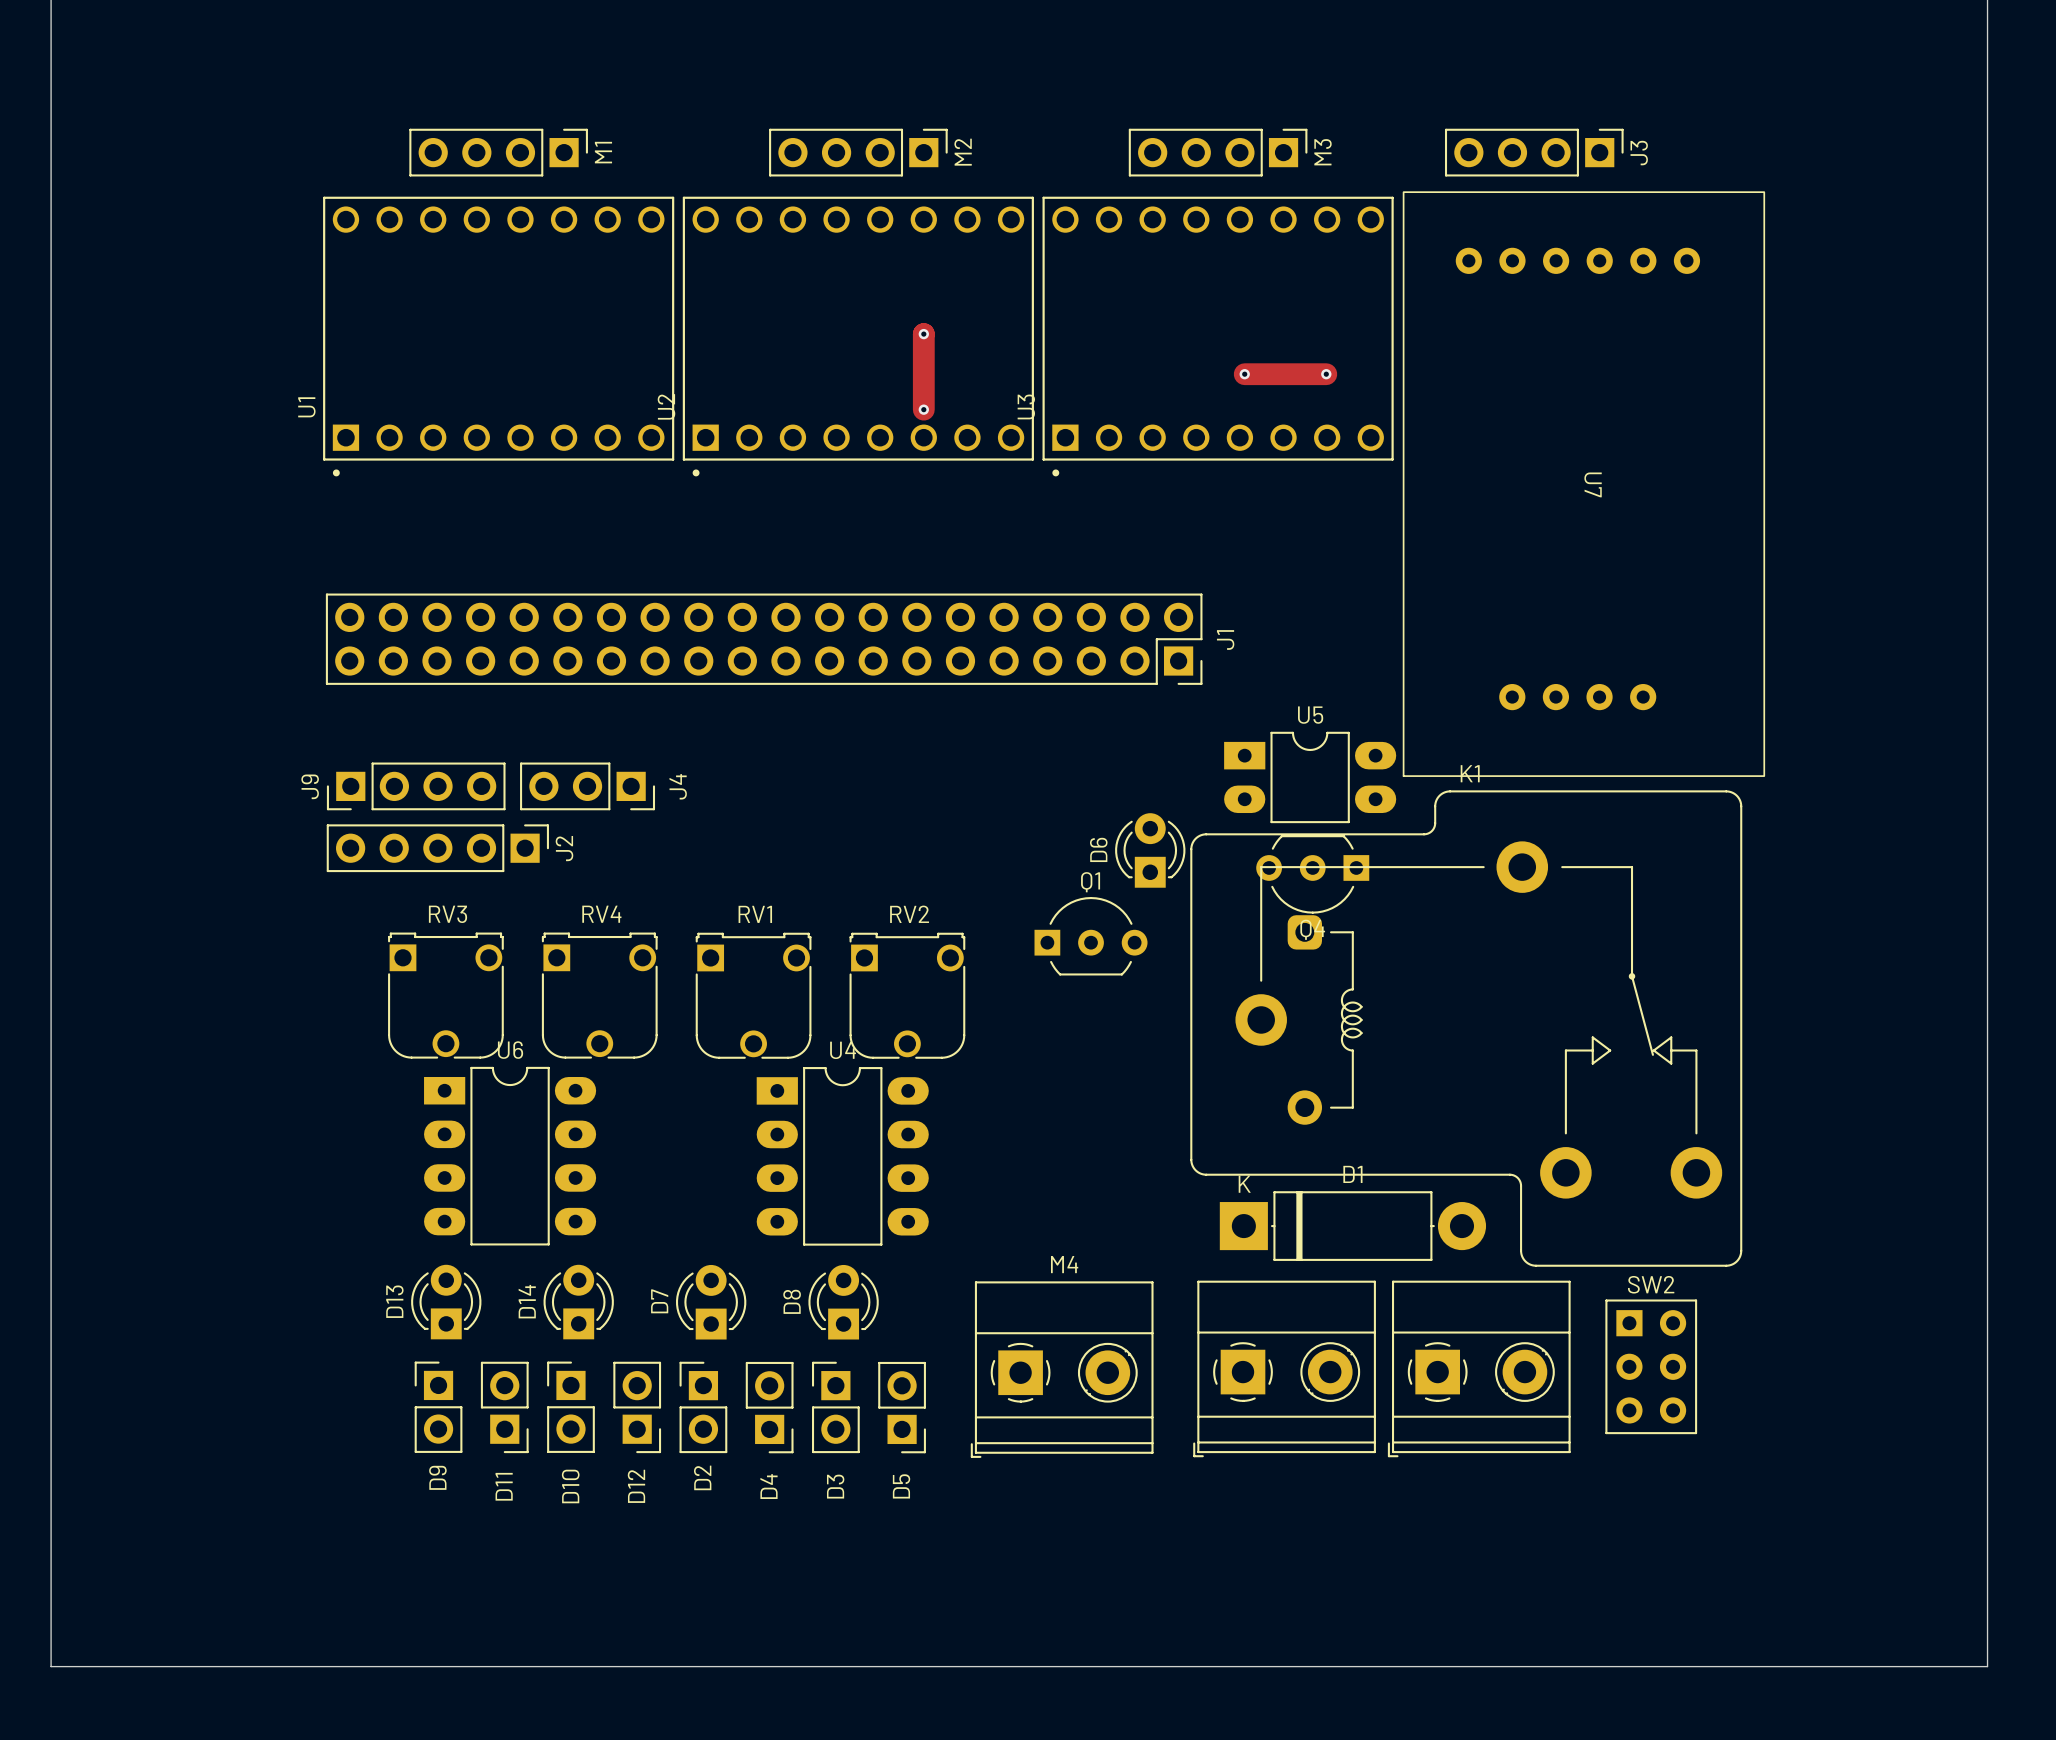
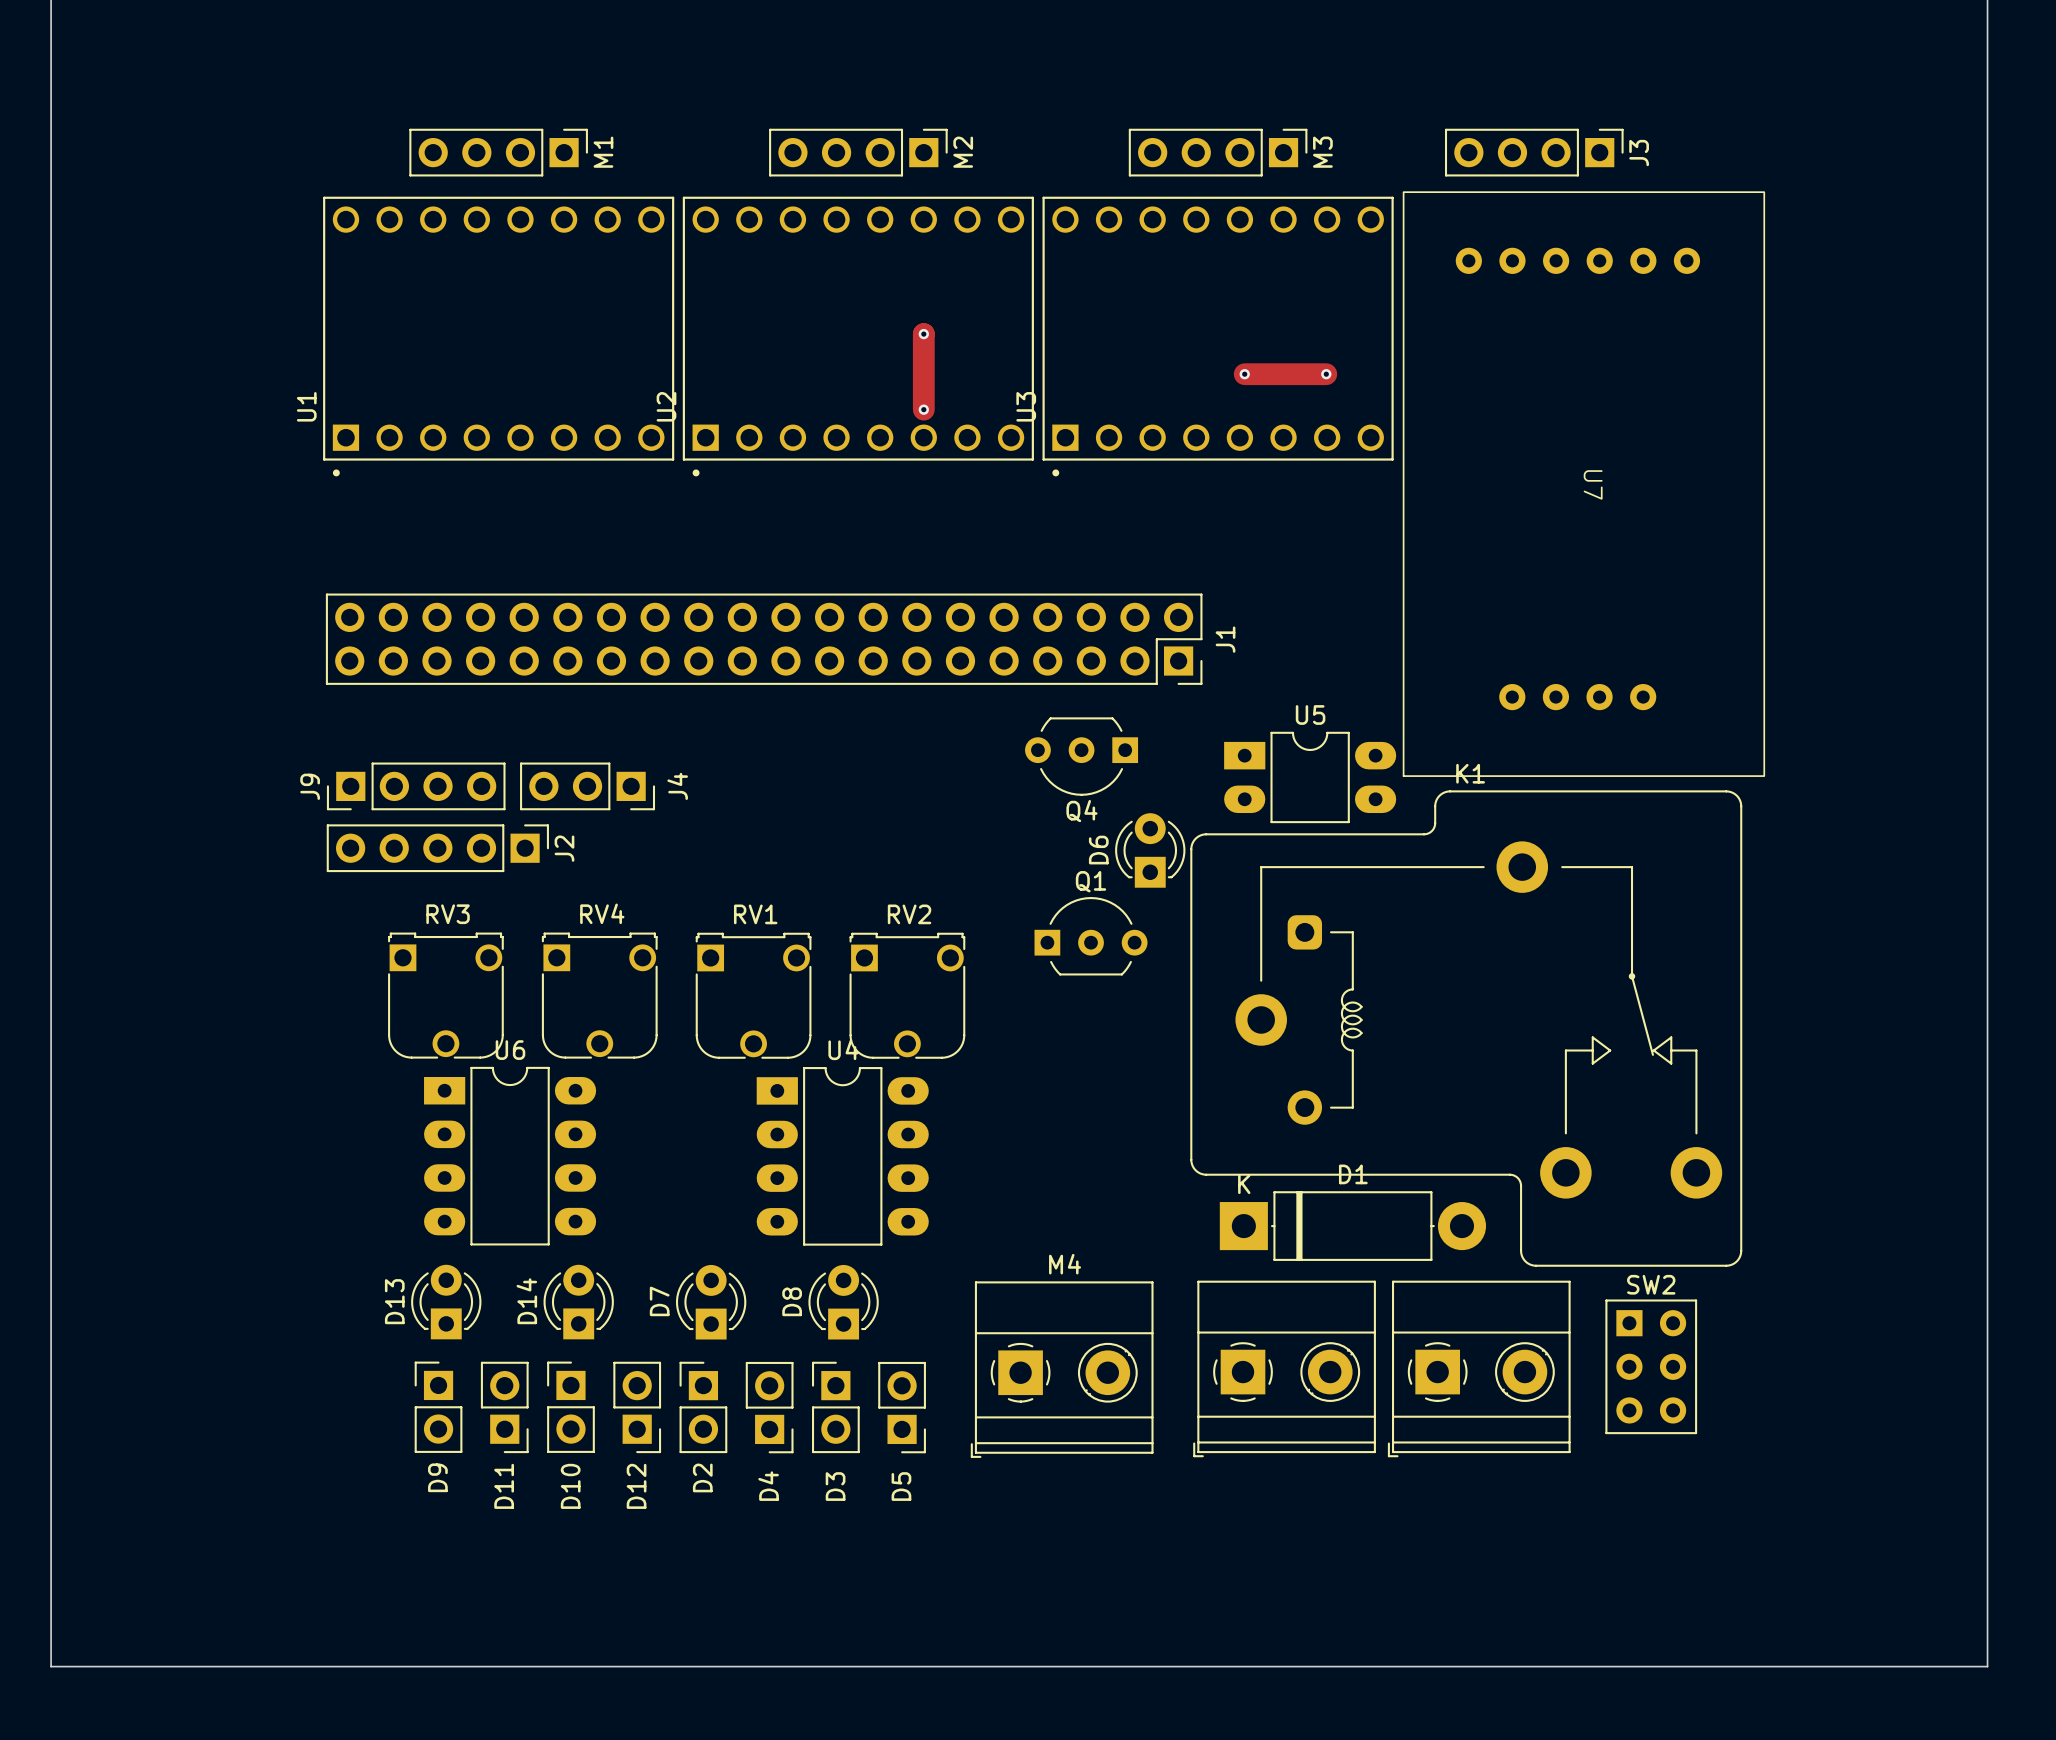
Q4 position: (1312, 874) -> (1081, 756)

